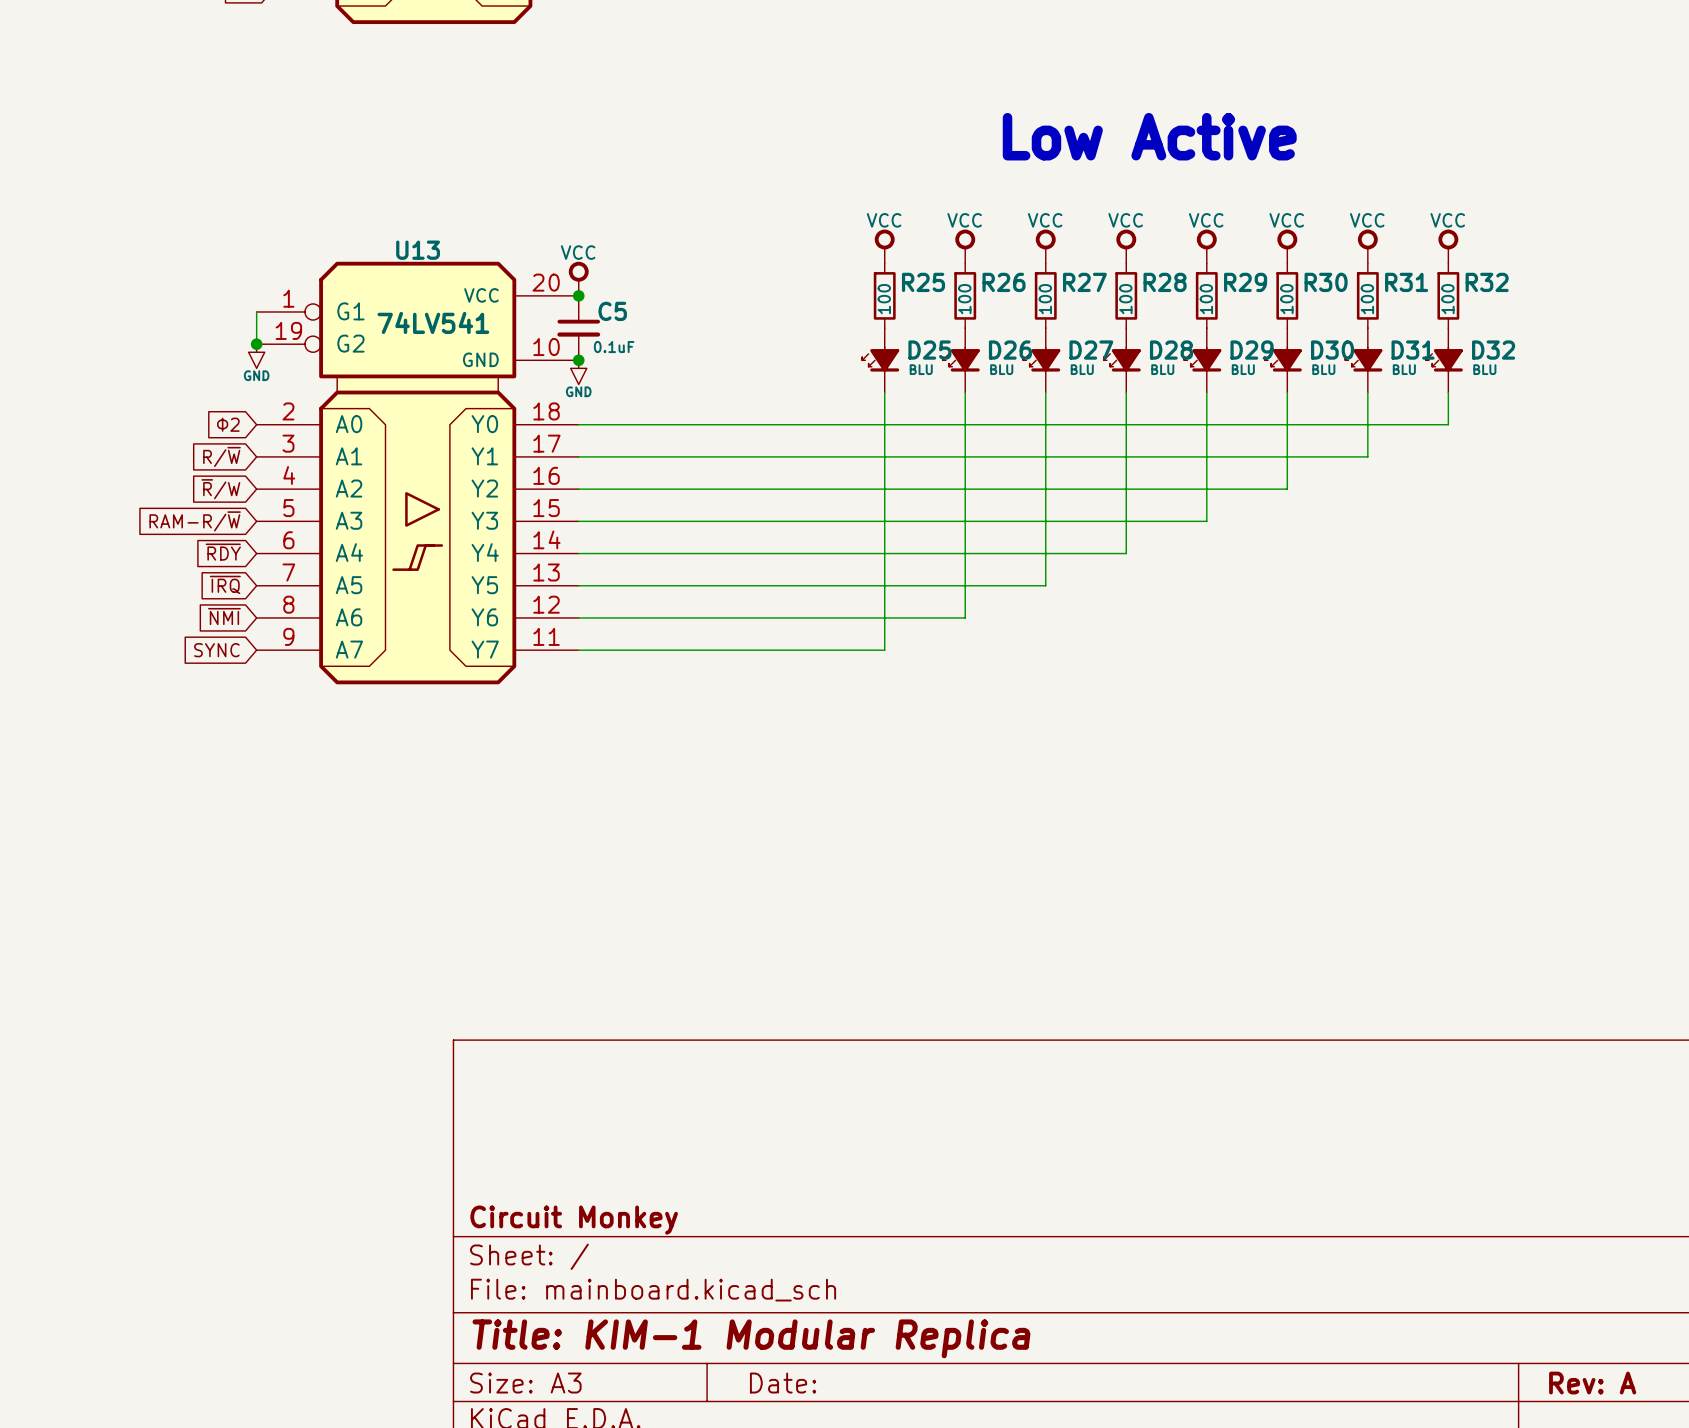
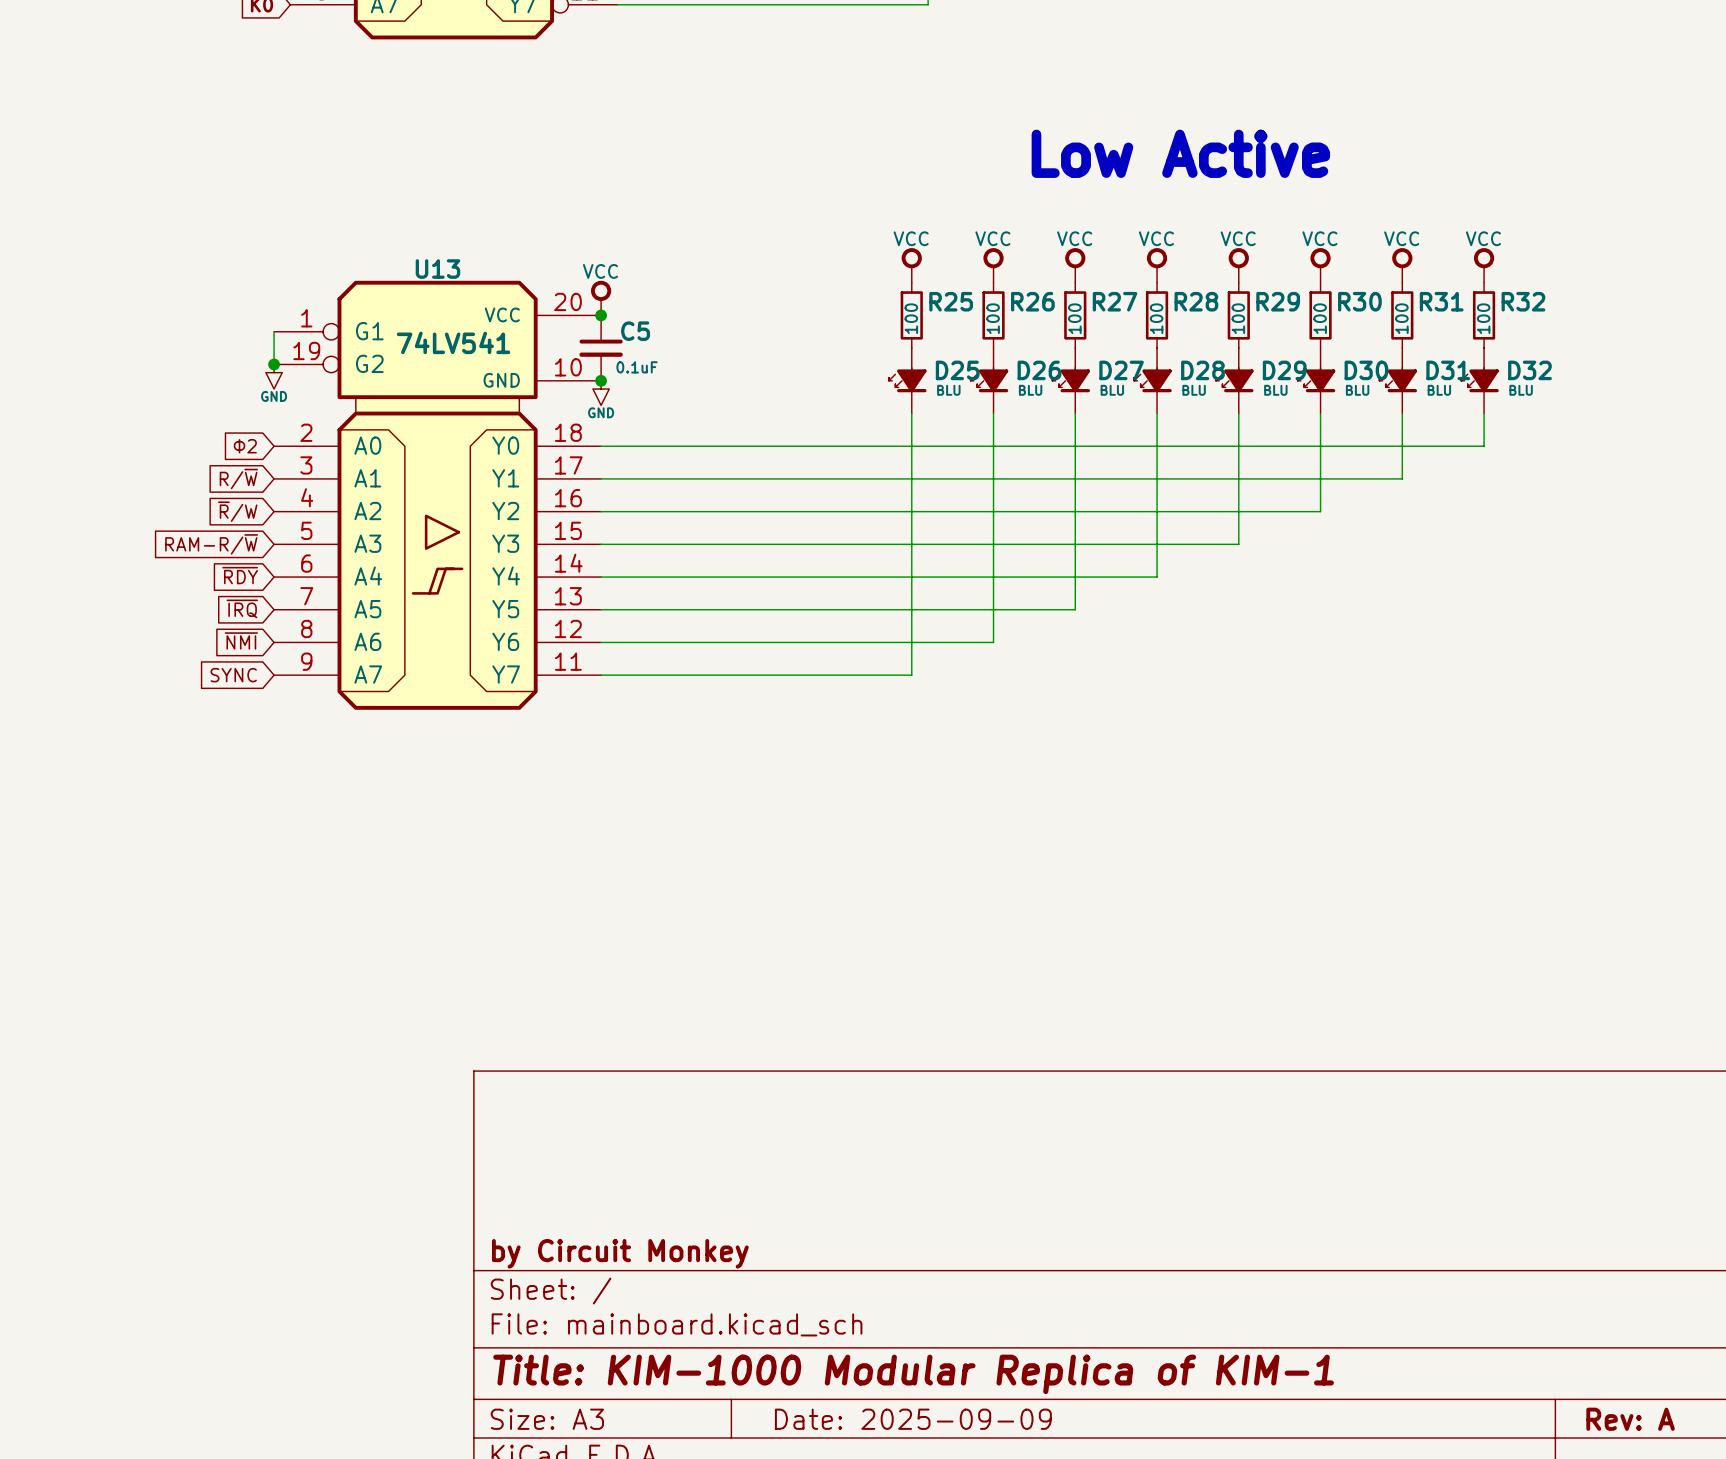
title block: Circuit Monkey (574, 1220) -> by Circuit Monkey (620, 1253)
title block: Title: KIM-1 Modular Replica (751, 1338) -> Title: KIM-1000 Modular Replica of KIM-1 (913, 1374)
title block: Date: (783, 1383) -> Date: 2025-09-09 (913, 1419)

